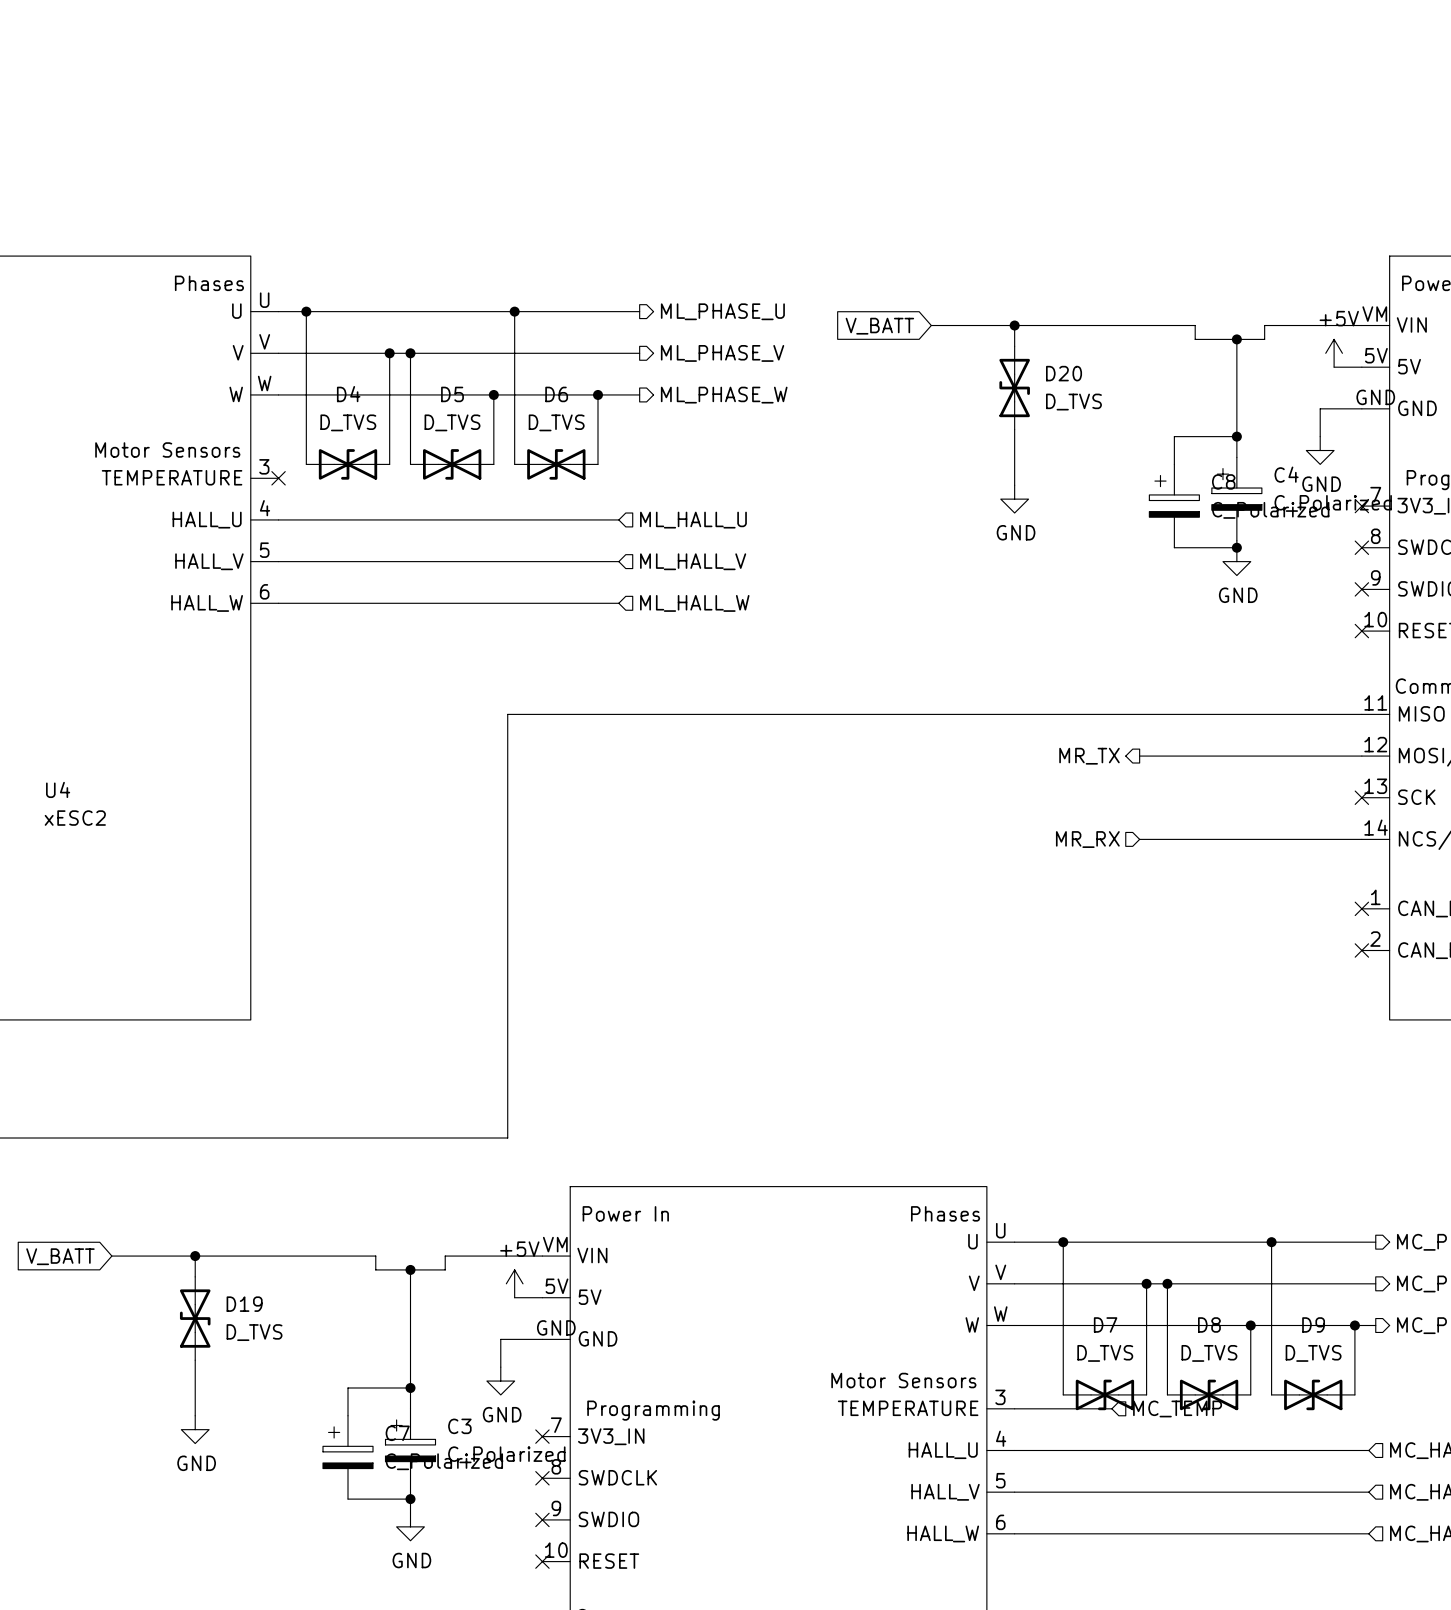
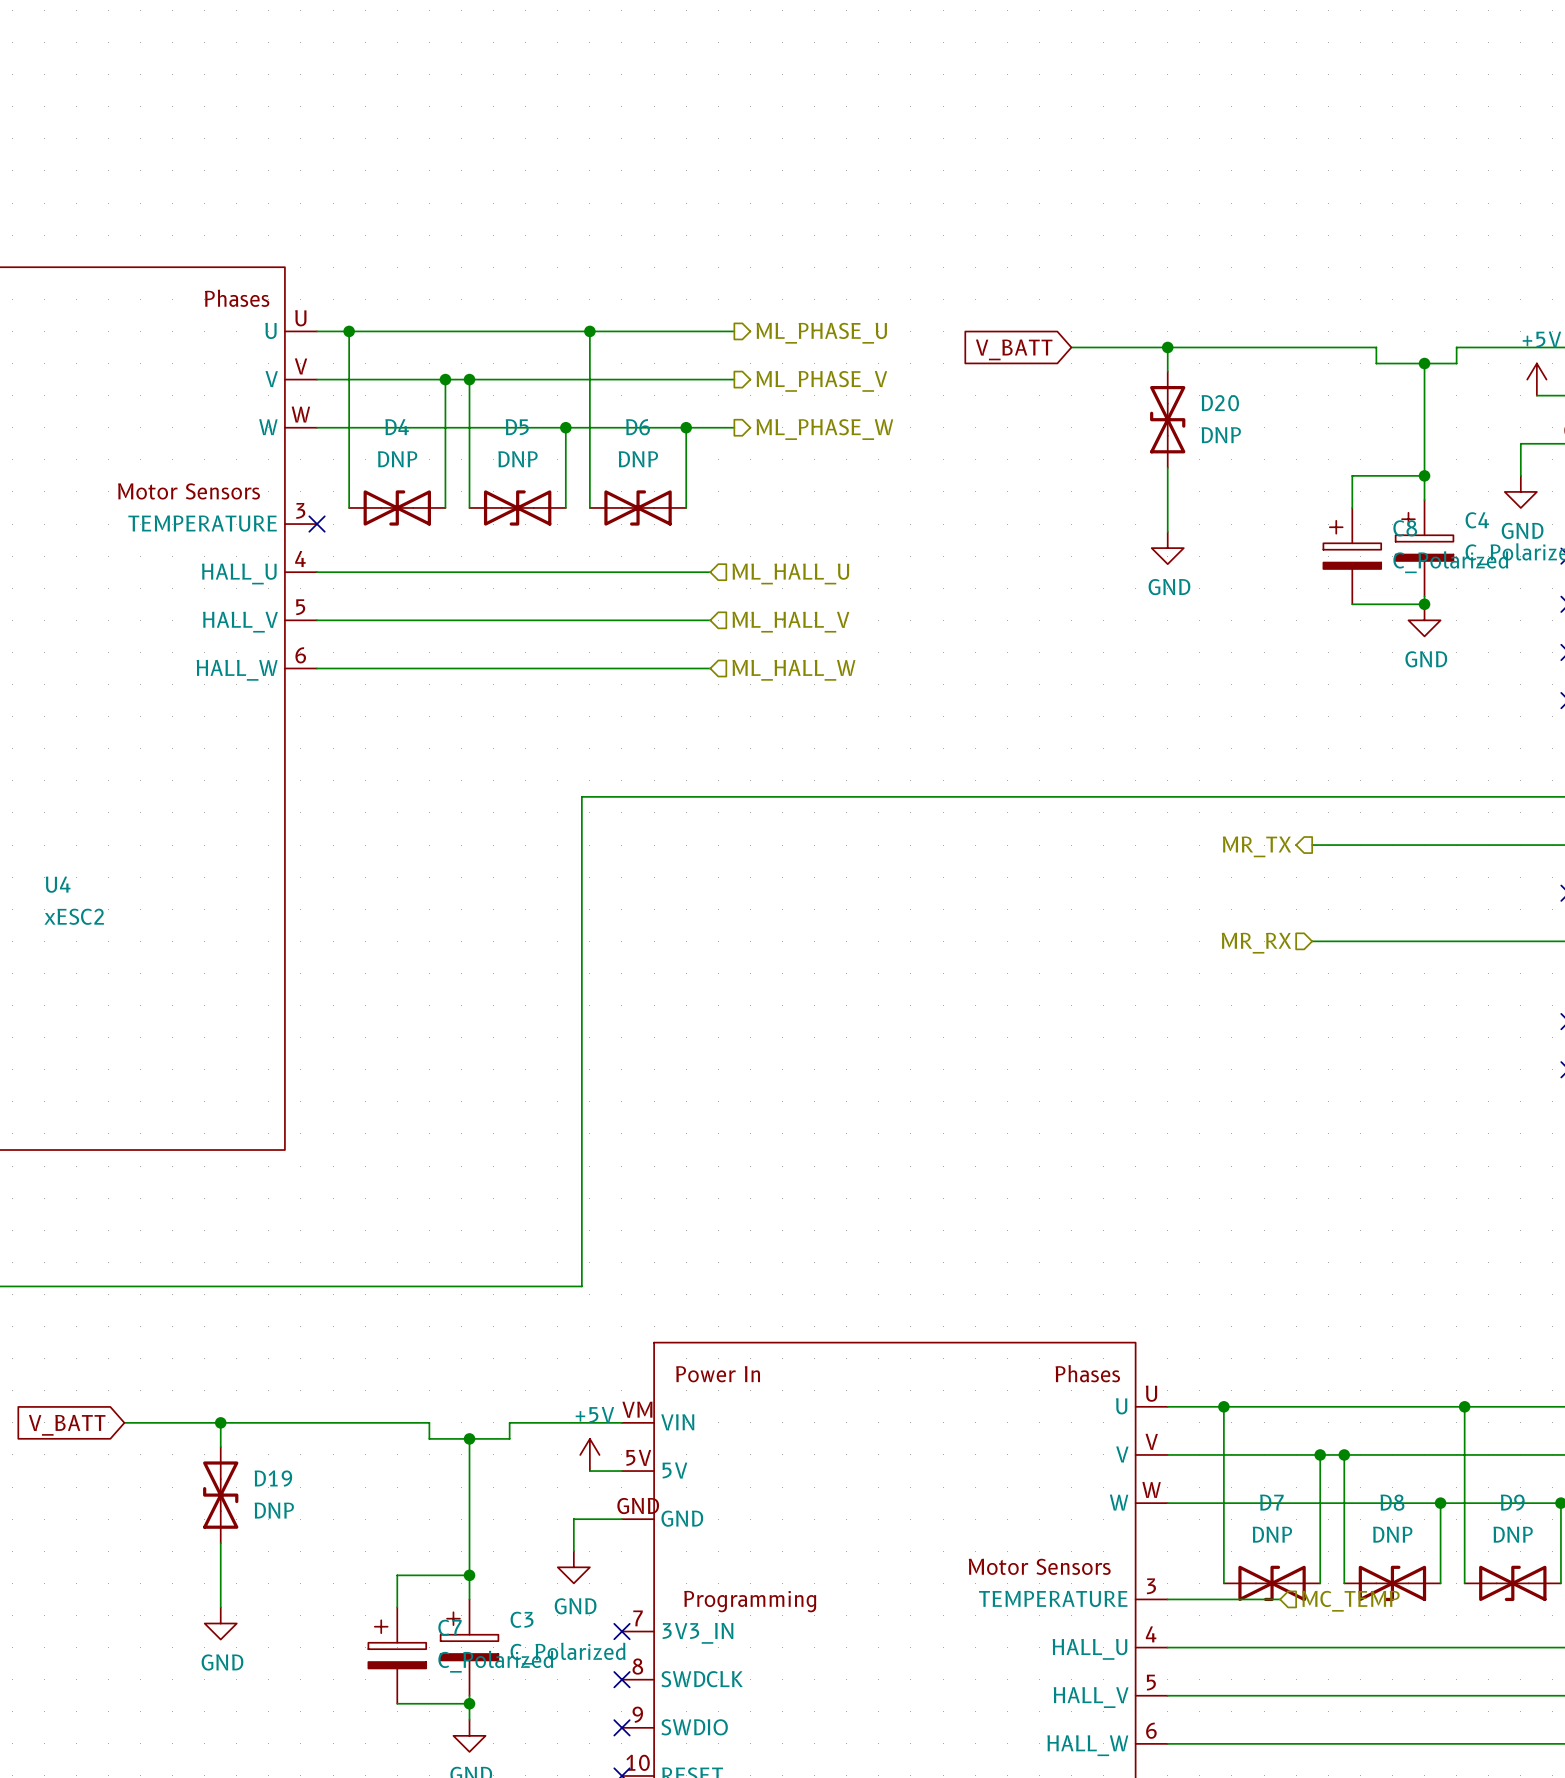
D20 value: D_TVS (1073, 402) -> DNP (1221, 435)
D4 value: D_TVS (348, 422) -> DNP (397, 459)
D5 value: D_TVS (452, 422) -> DNP (517, 459)
D6 value: D_TVS (556, 422) -> DNP (638, 459)
D19 value: D_TVS (254, 1332) -> DNP (274, 1510)
D7 value: D_TVS (1105, 1353) -> DNP (1272, 1534)
D8 value: D_TVS (1209, 1353) -> DNP (1392, 1534)
D9 value: D_TVS (1313, 1353) -> DNP (1513, 1534)

